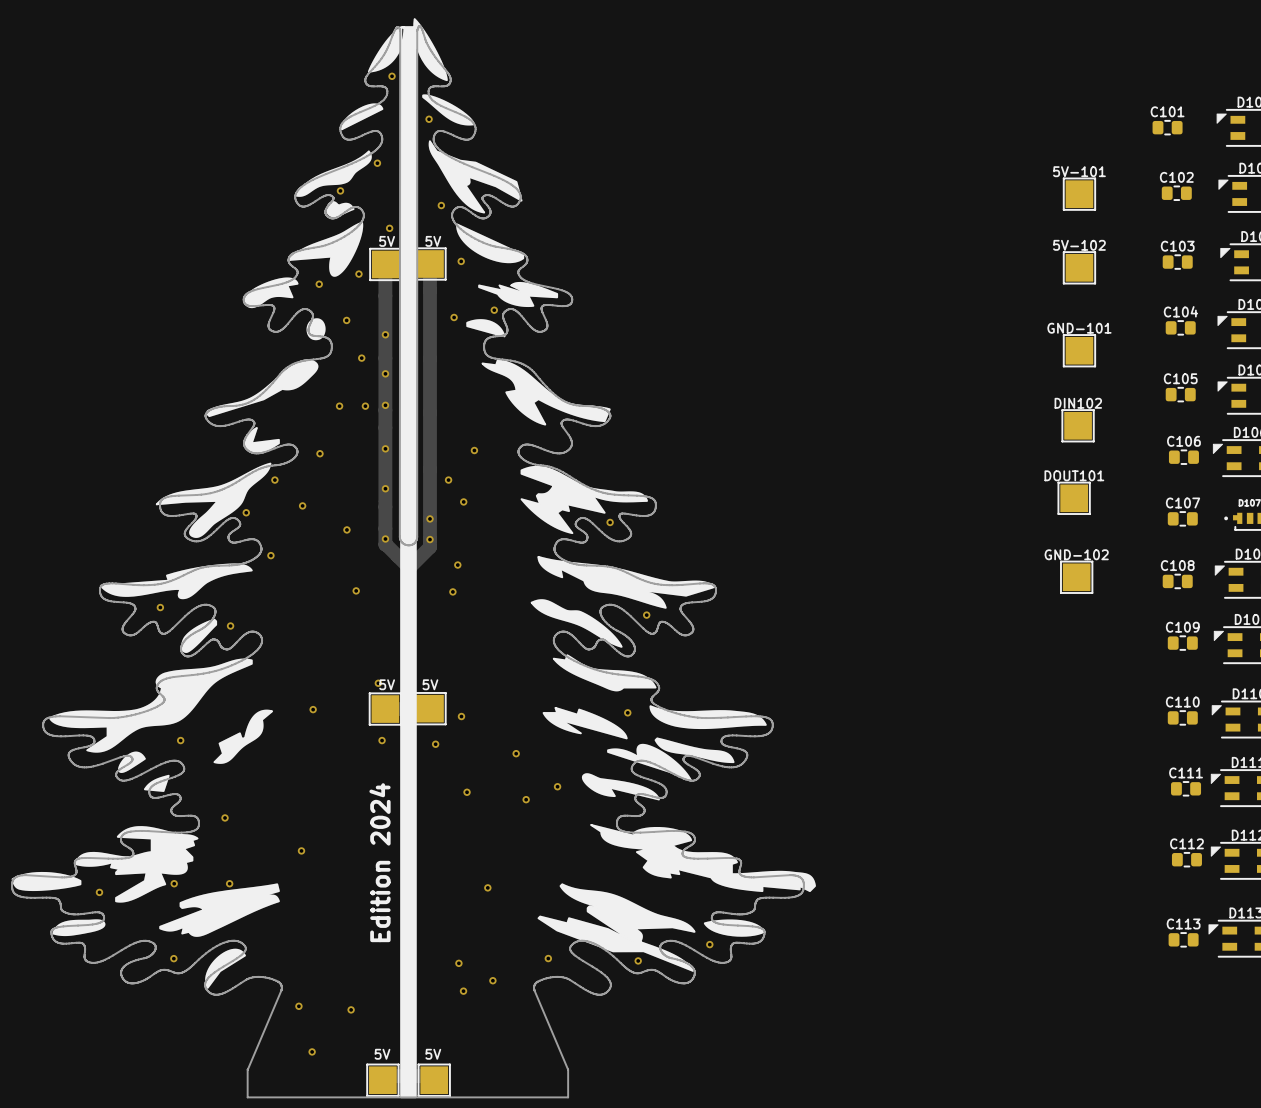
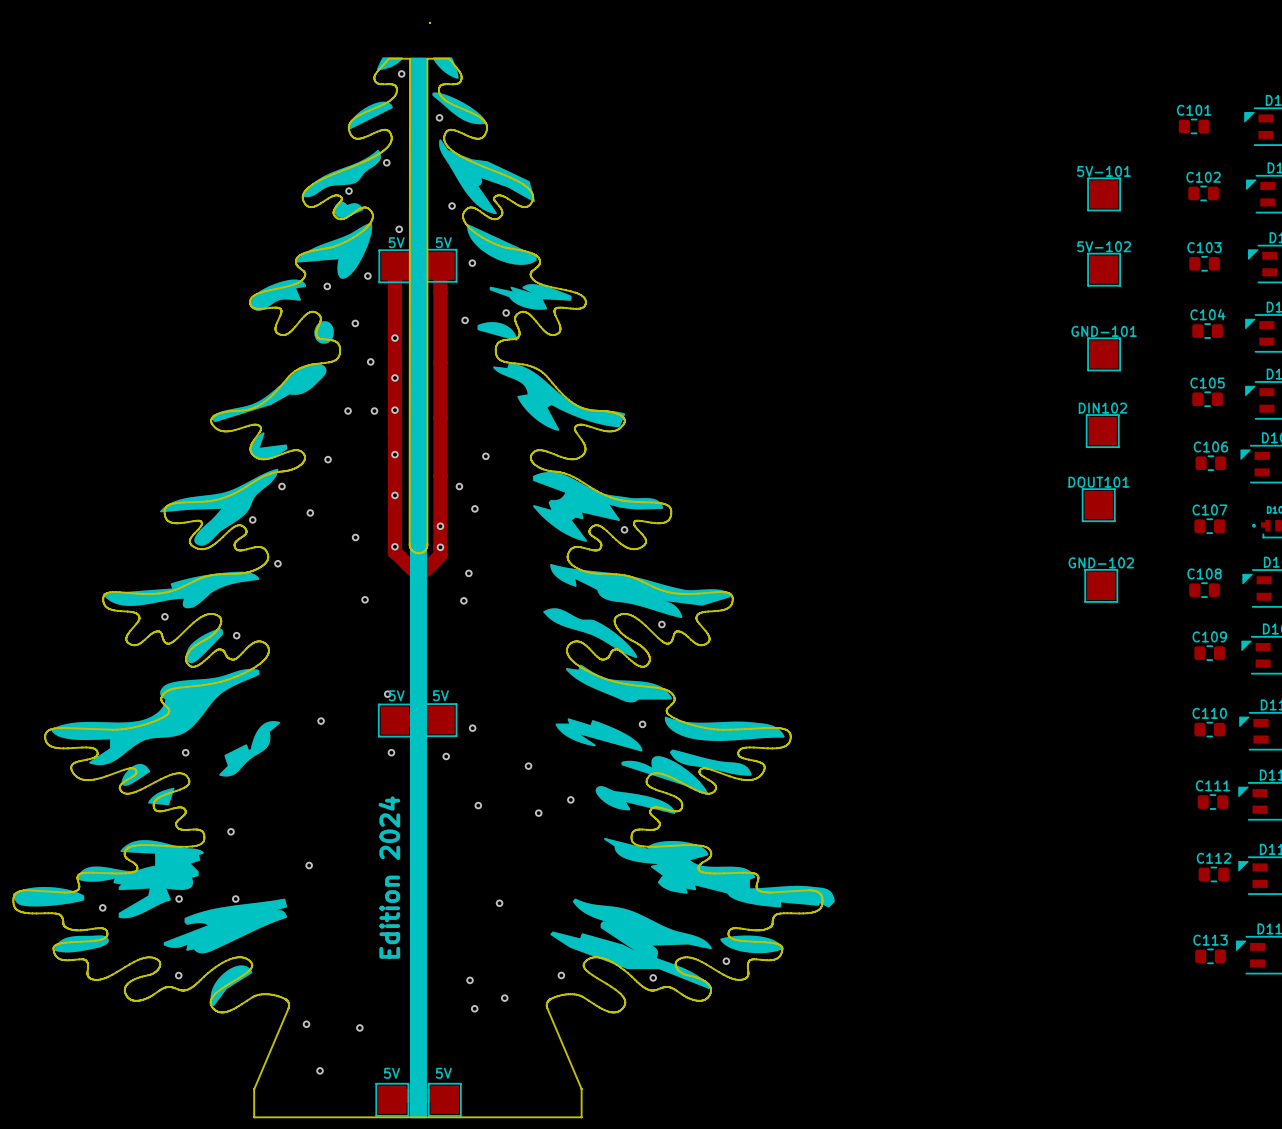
drawing: [367, 18, 448, 1099] -> none
board edge: (419, 26) (427, 45) (438, 61) -> (427, 58) (449, 58)
board edge: (418, 27) (417, 61) -> none
drawing: none -> [377, 57, 459, 1119]
board edge: (379, 61) (397, 27) (400, 30) (400, 61) -> (388, 58) (410, 58)

